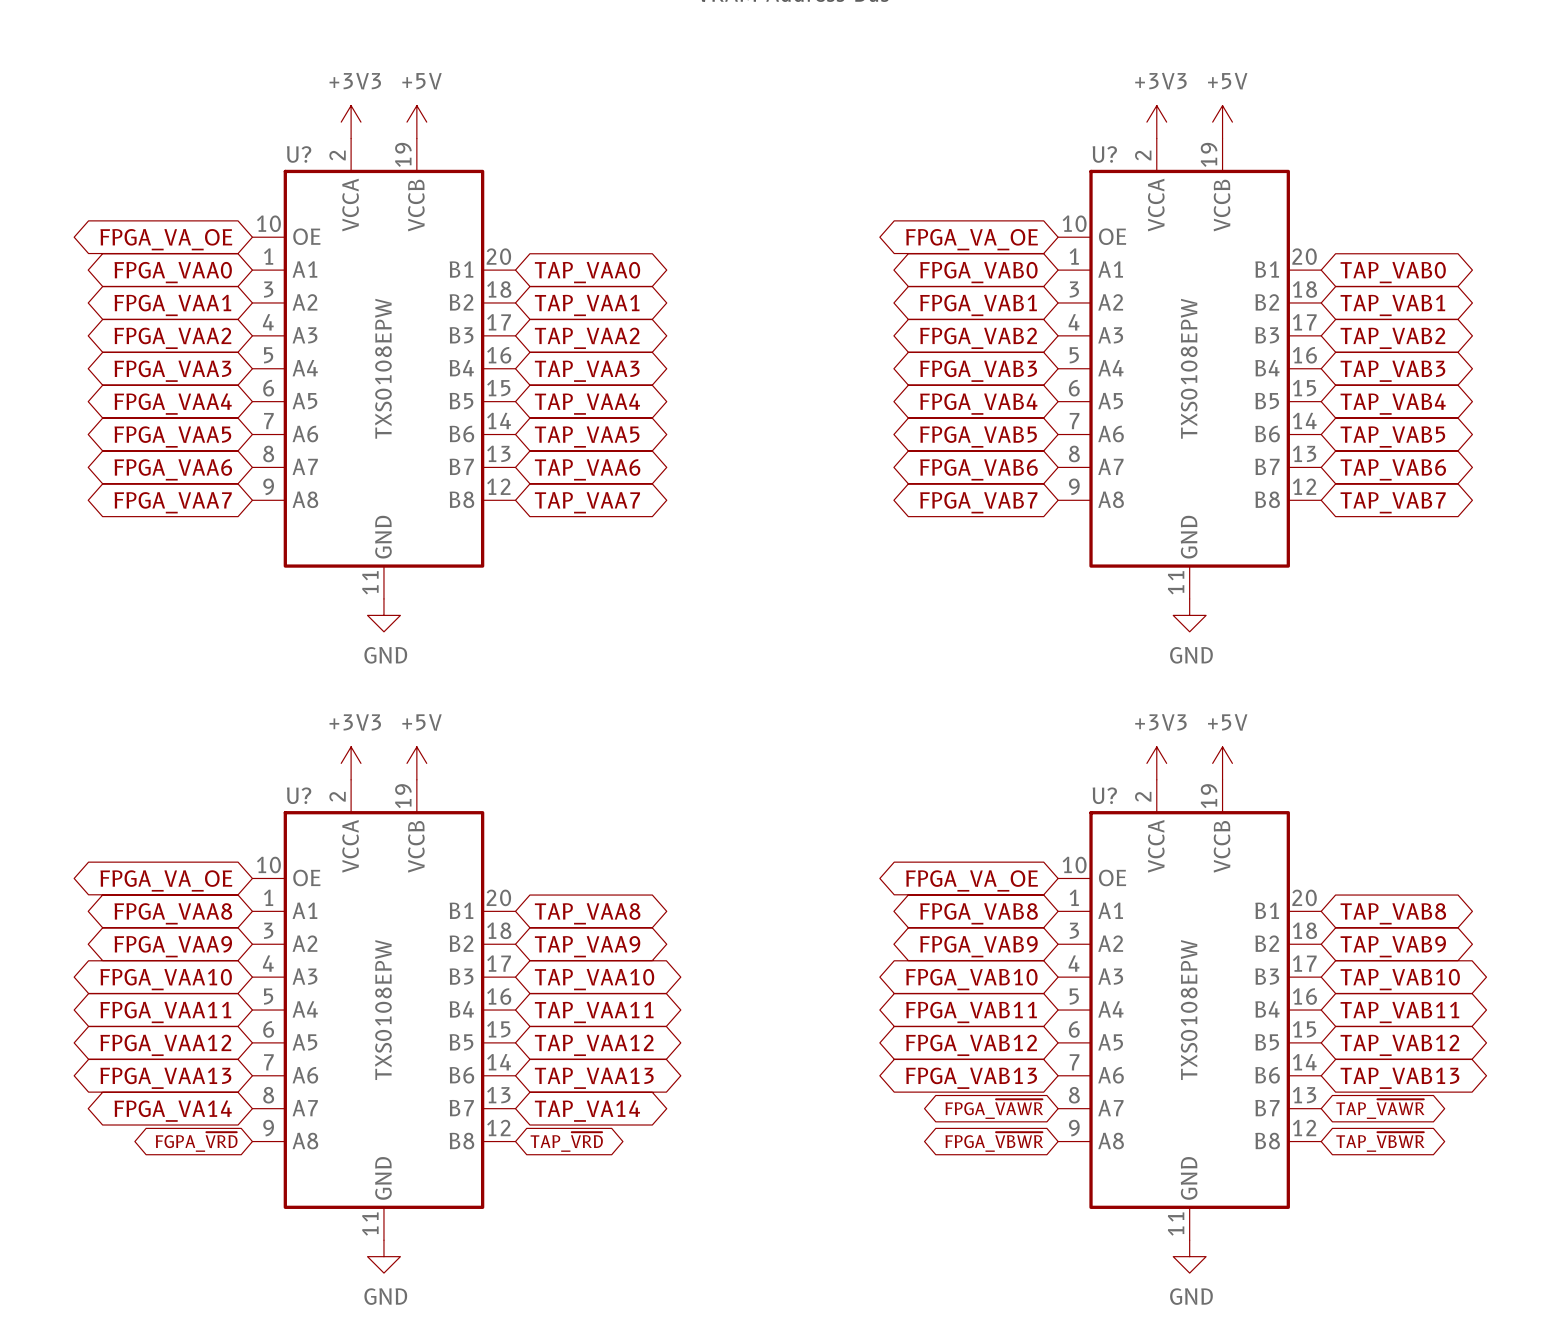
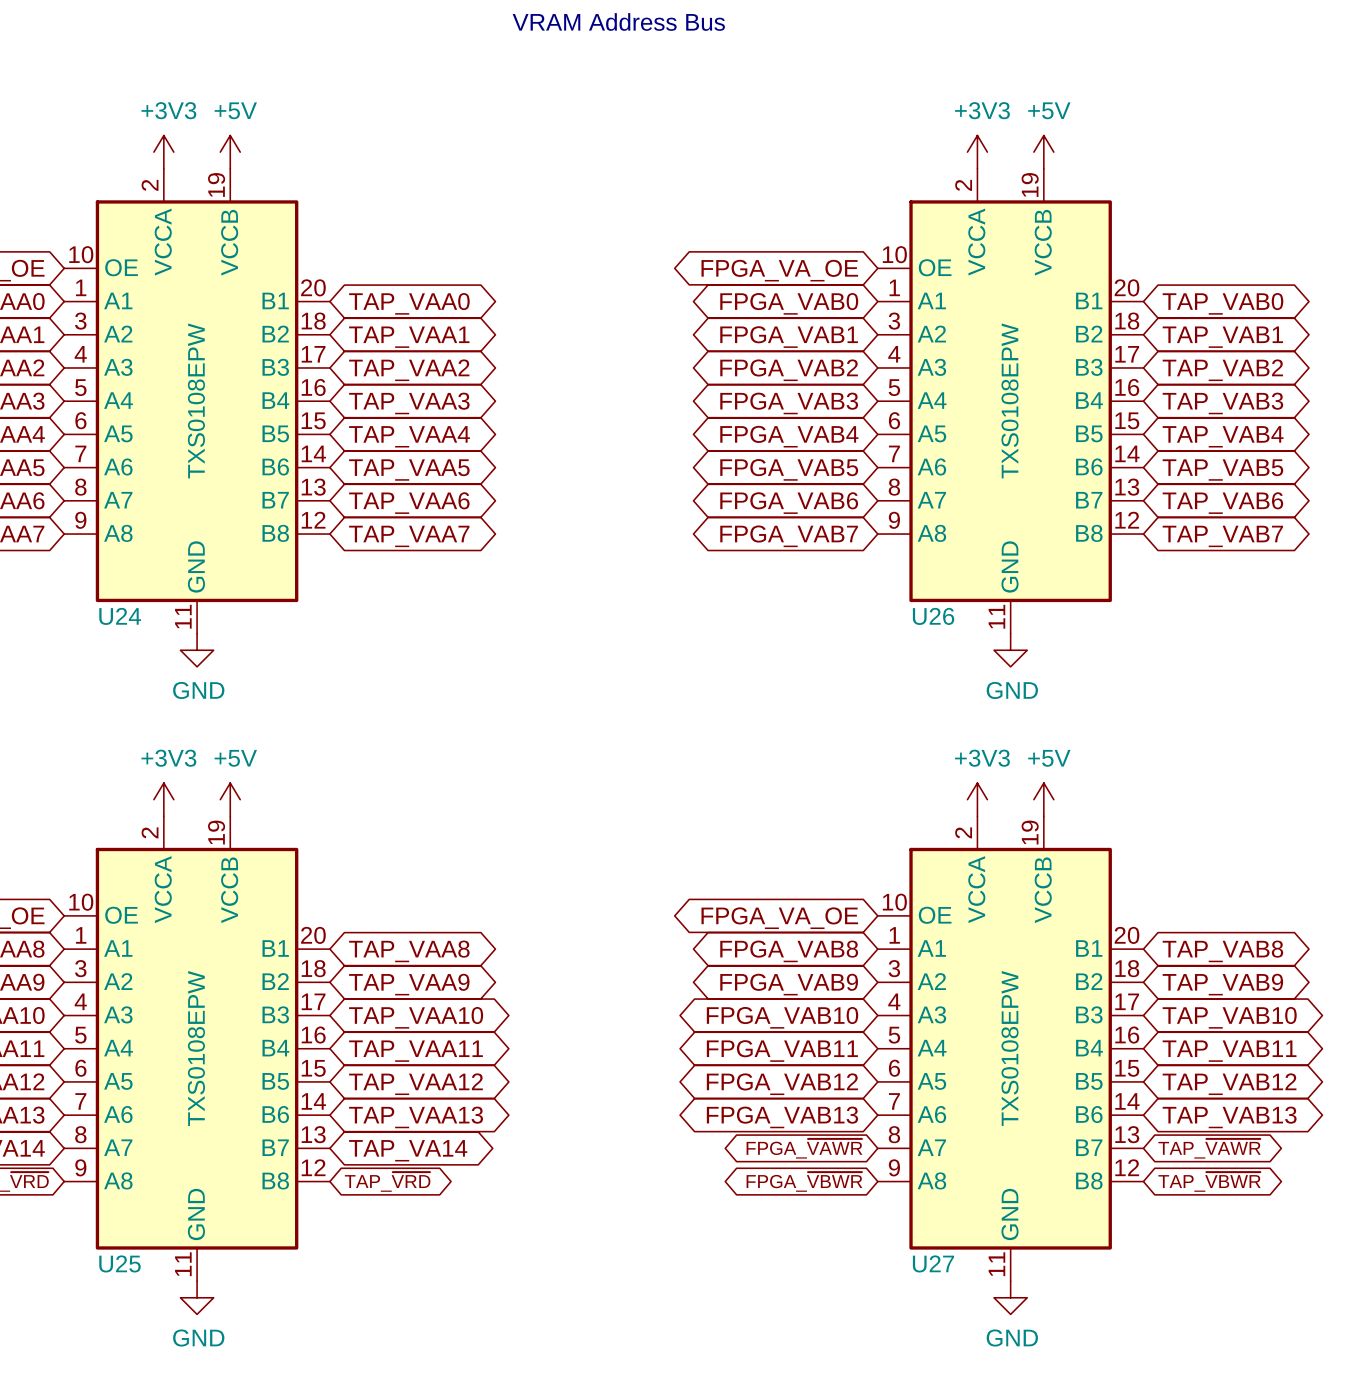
U? name: U? (299, 154) -> U24 (120, 616)
U? name: U? (1104, 154) -> U26 (933, 616)
U? name: U? (299, 795) -> U25 (120, 1263)
U? name: U? (1104, 795) -> U27 (933, 1263)

